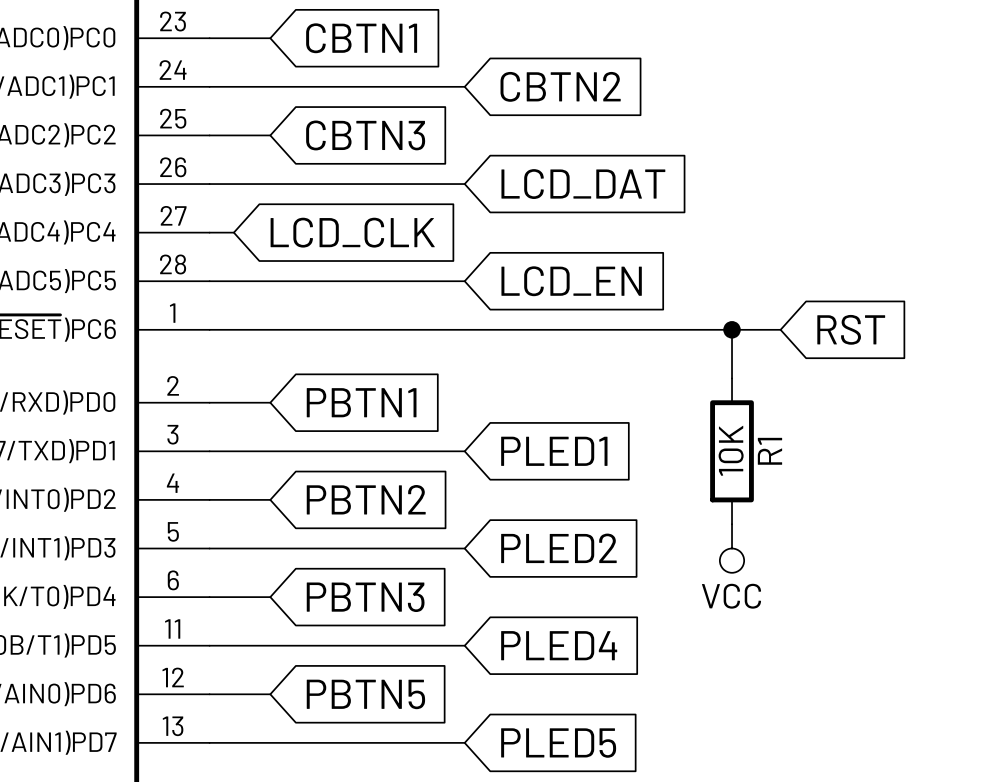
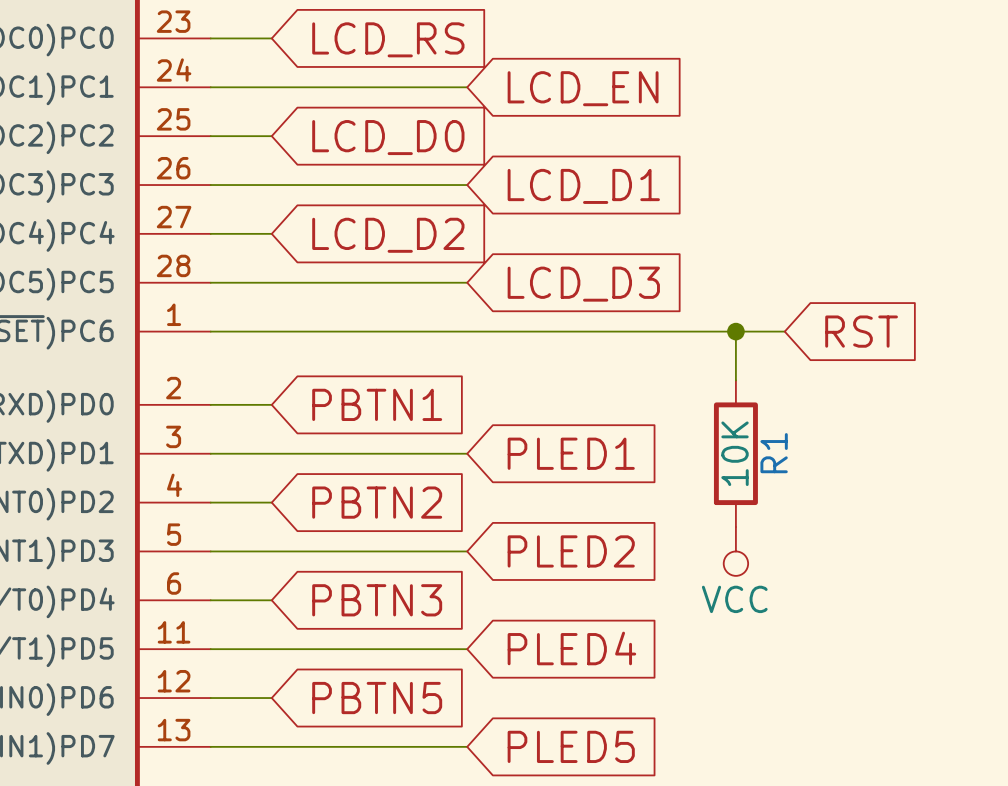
global label: CBTN1 (361, 38) -> LCD_RS (388, 39)
global label: CBTN2 (560, 86) -> LCD_EN (583, 88)
global label: CBTN3 (365, 135) -> LCD_D0 (388, 137)
global label: LCD_DAT (583, 184) -> LCD_D1 (583, 186)
wire: none -> (235, 233) (271, 233)
global label: LCD_CLK (352, 232) -> LCD_D2 (388, 235)
global label: LCD_EN (571, 281) -> LCD_D3 (583, 284)

